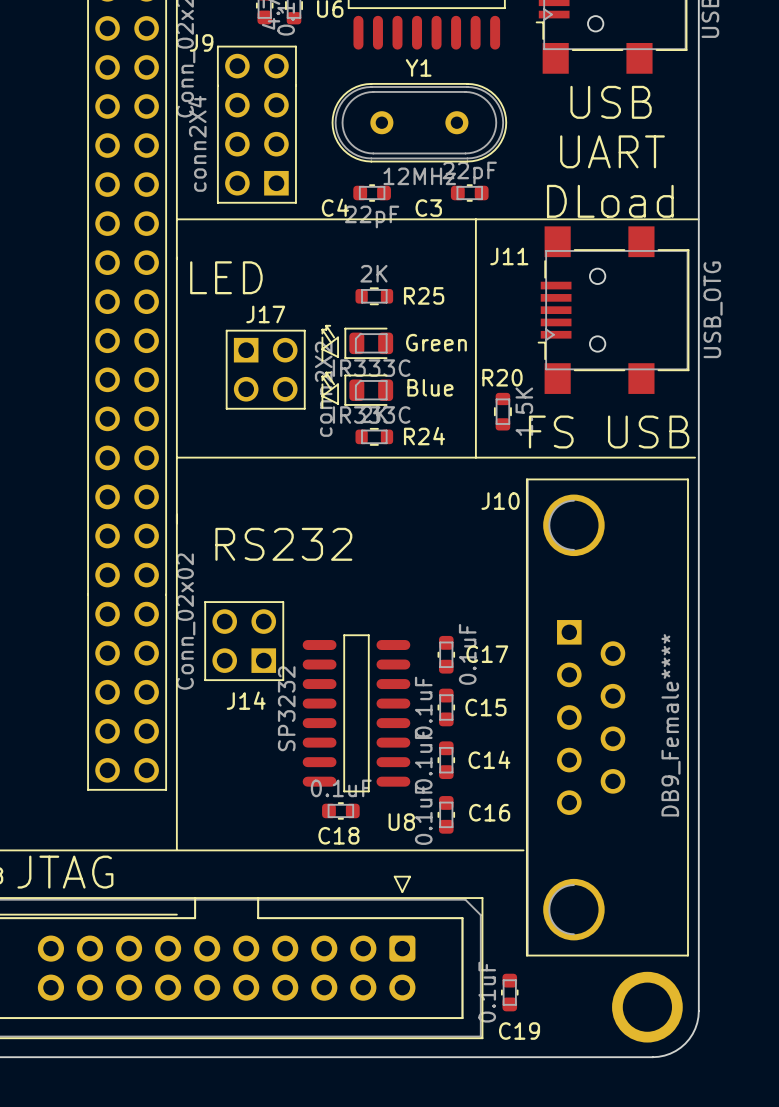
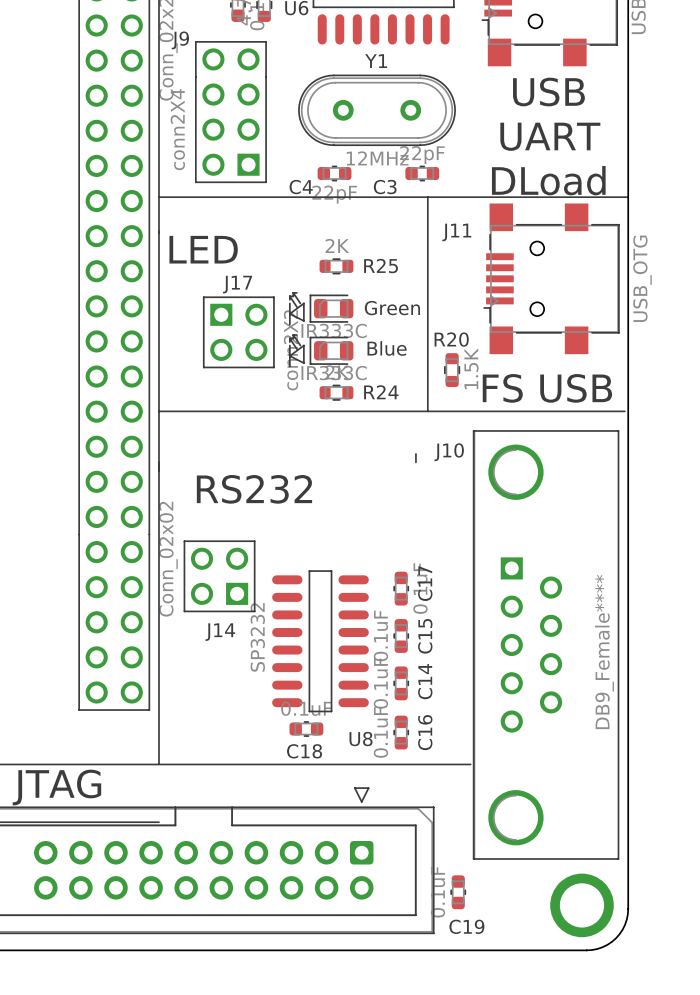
line: none -> (415, 453) (415, 462)
C17 name rotation: 0° (487, 654) -> 90° counterclockwise (425, 583)
C15 name rotation: 0° (485, 707) -> 90° counterclockwise (425, 636)
C14 name rotation: 0° (489, 759) -> 90° counterclockwise (425, 681)
C16 name rotation: 0° (489, 812) -> 90° counterclockwise (425, 732)

